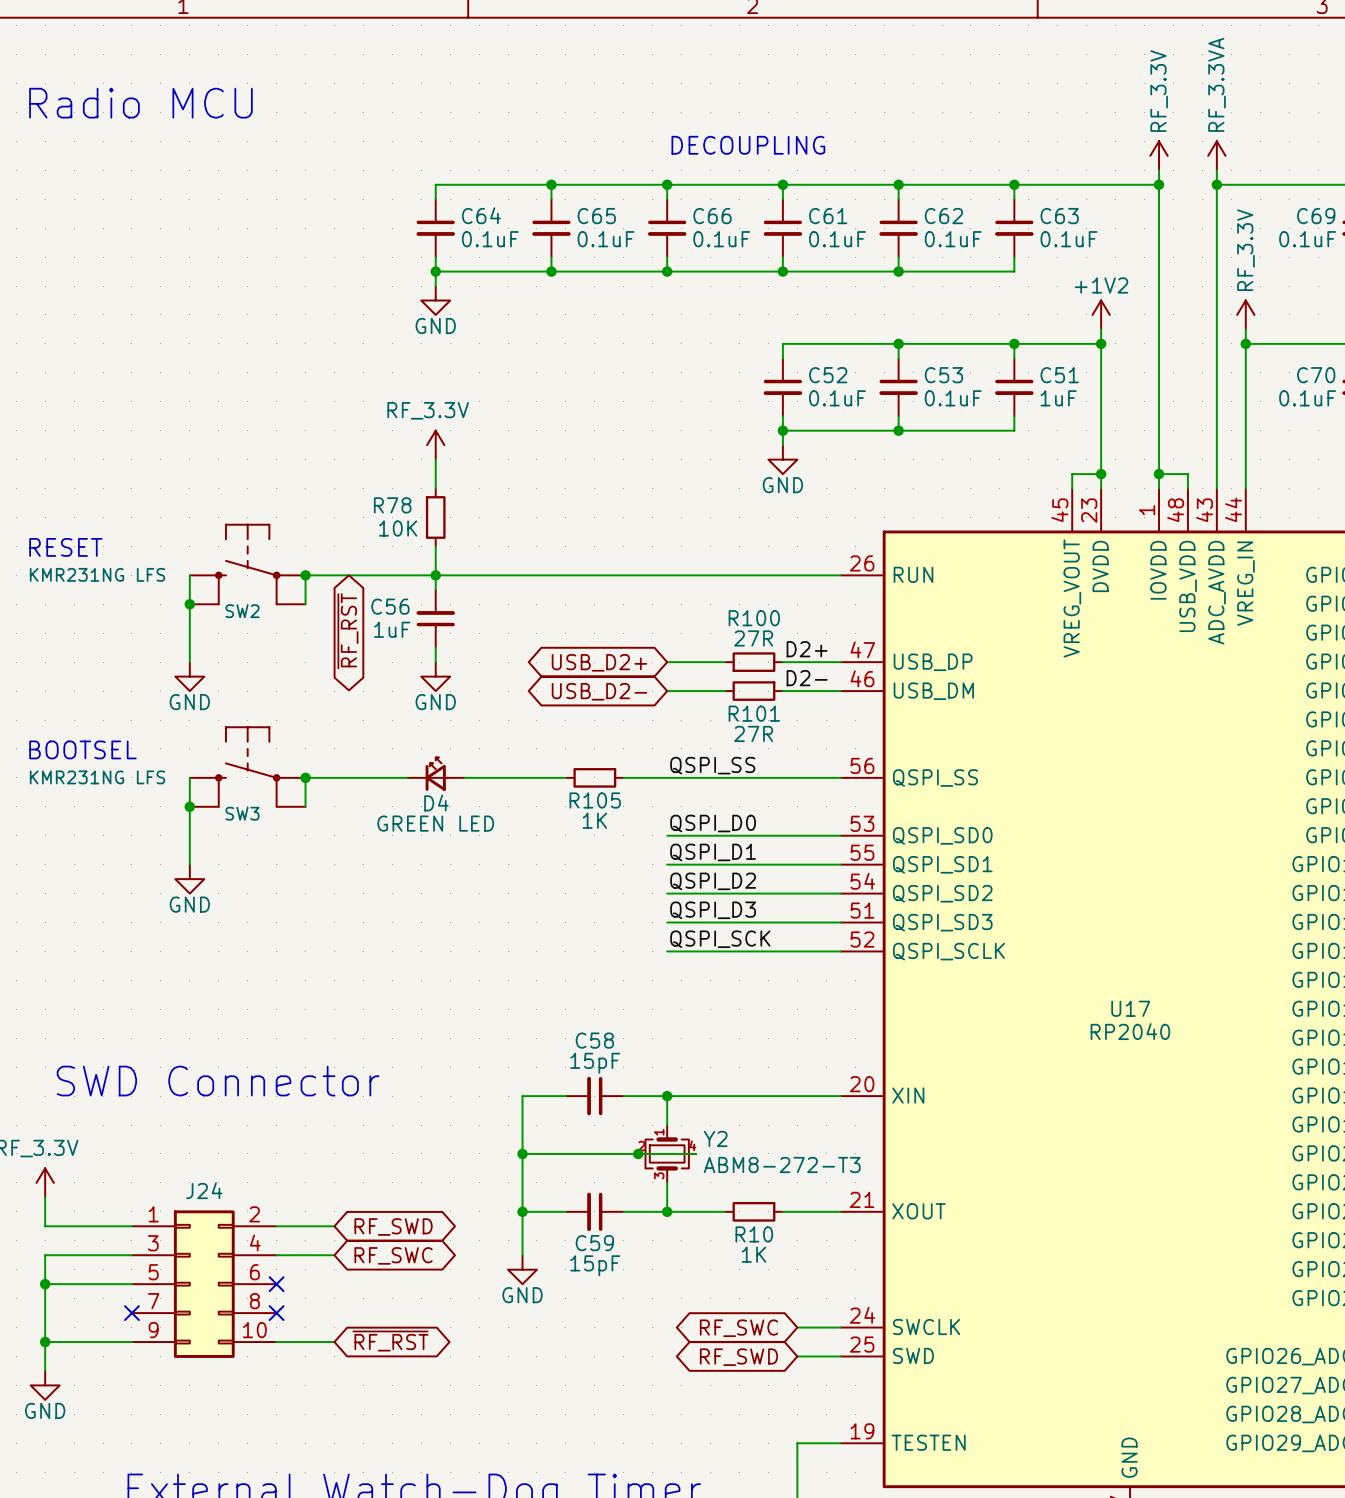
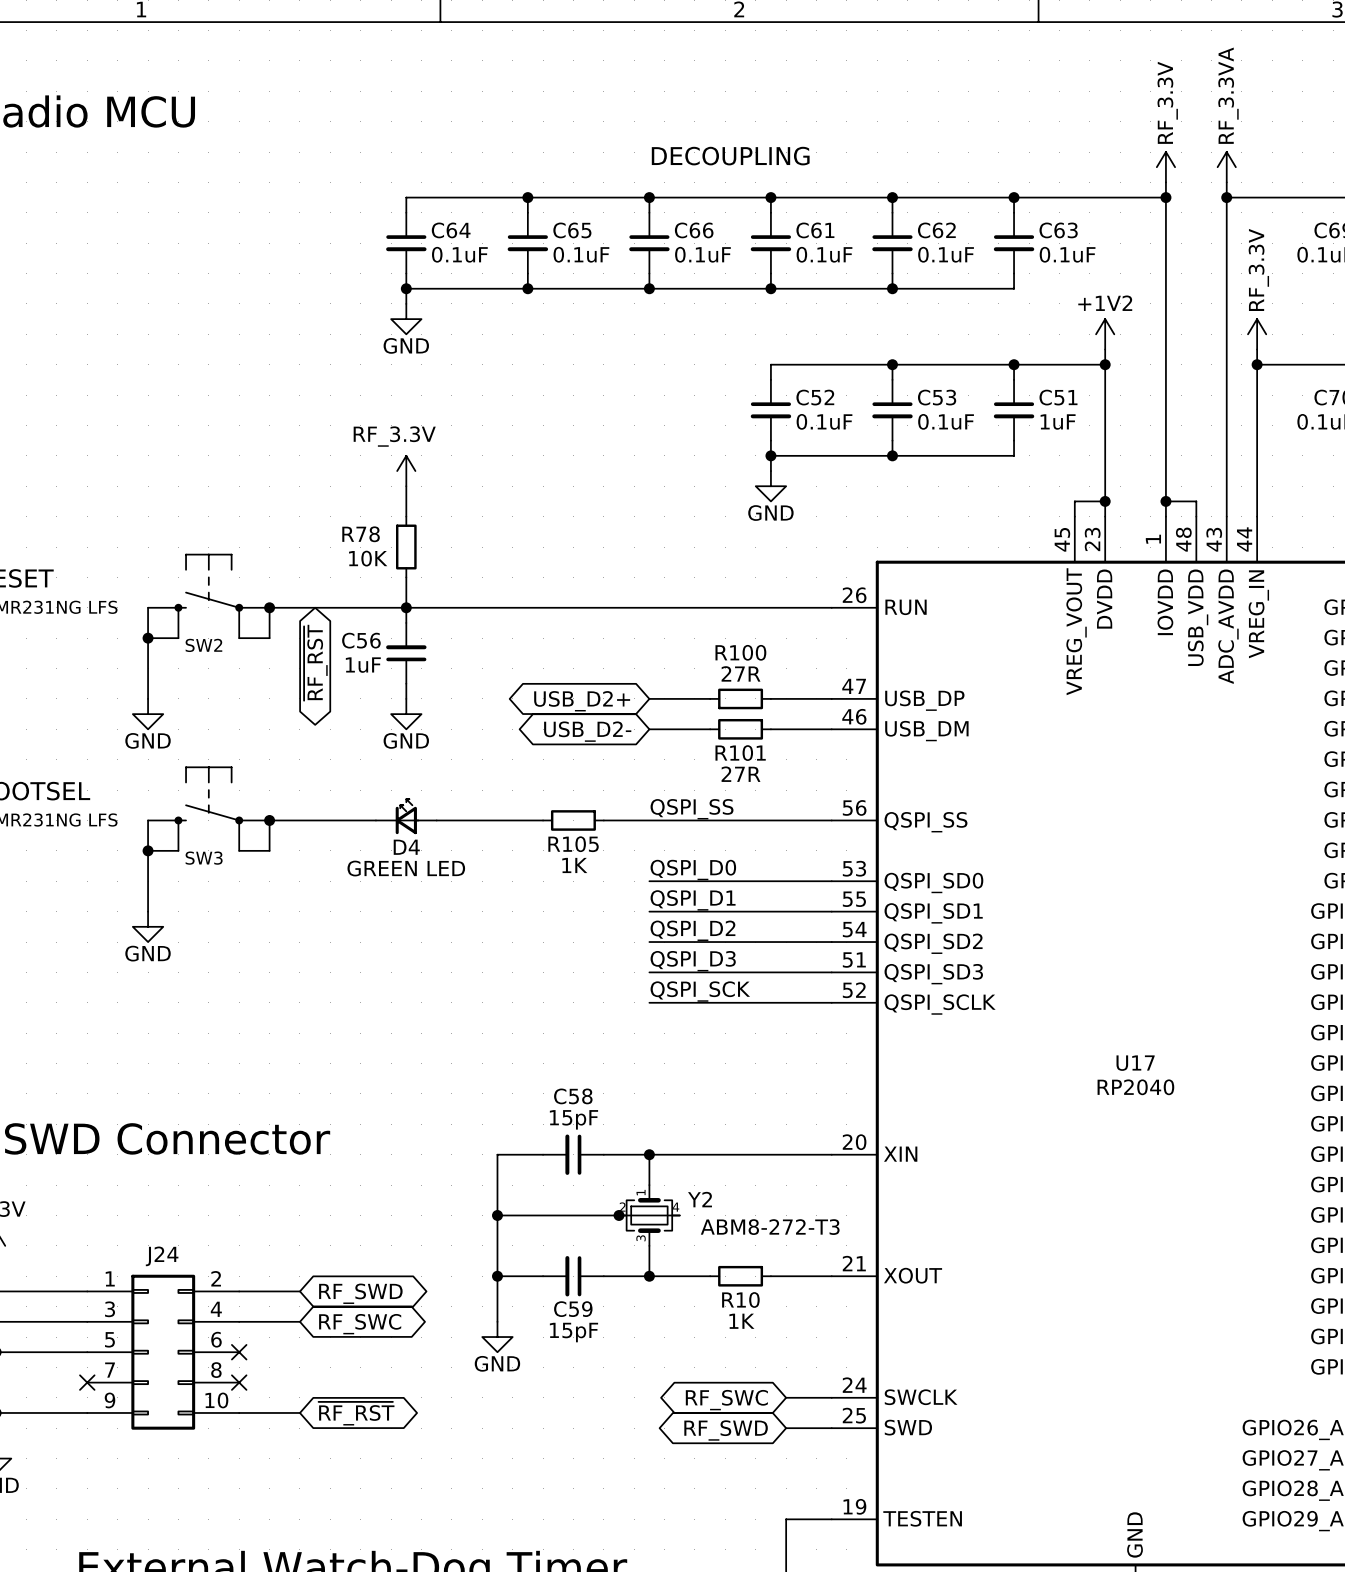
label: D2+ (807, 649) -> none
label: D2- (807, 678) -> none

